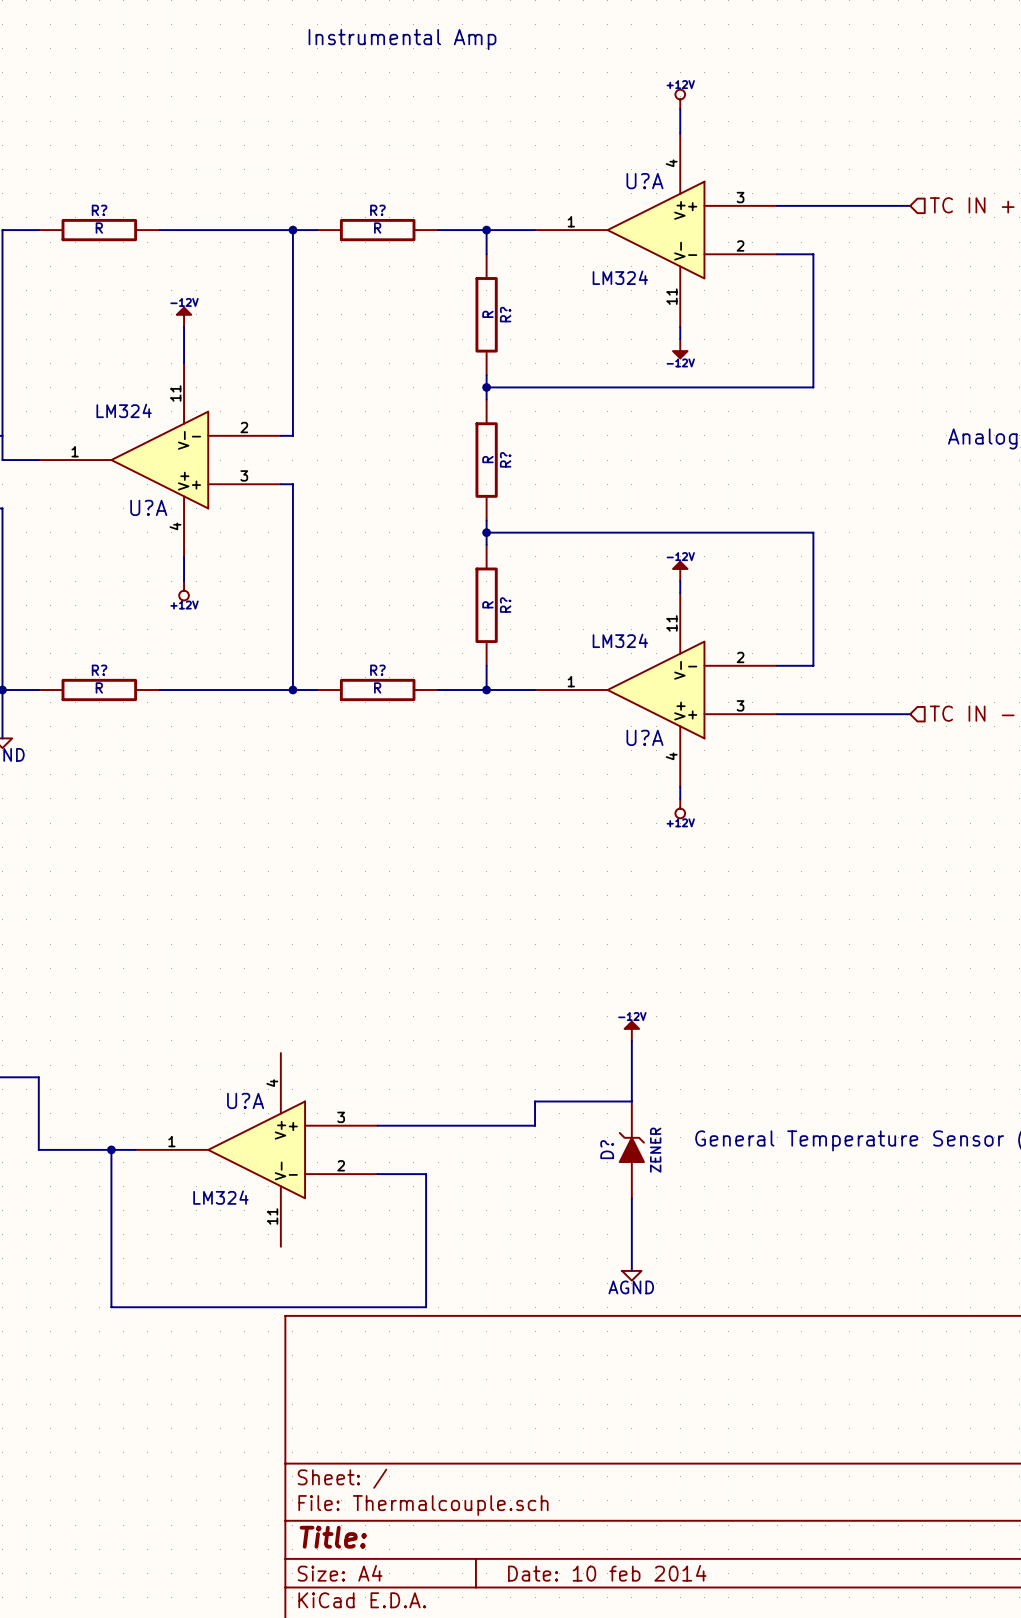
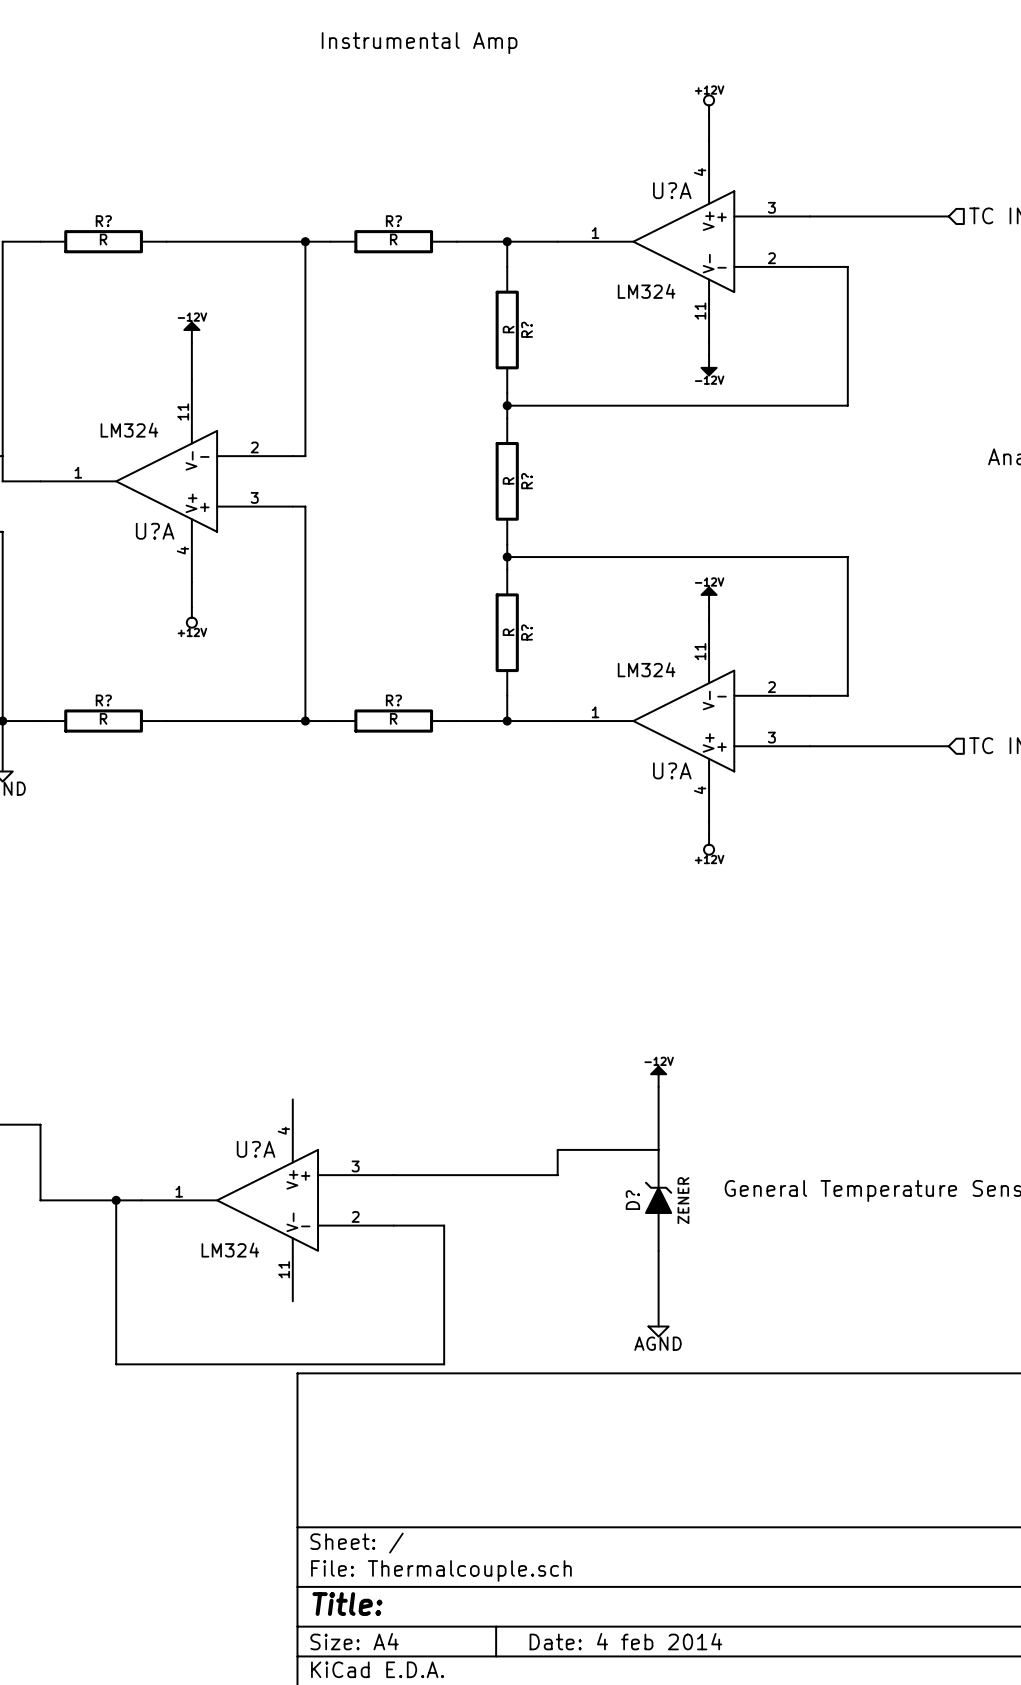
title block: Date: 10 feb 2014 (607, 1573) -> Date: 4 feb 2014 (625, 1641)

